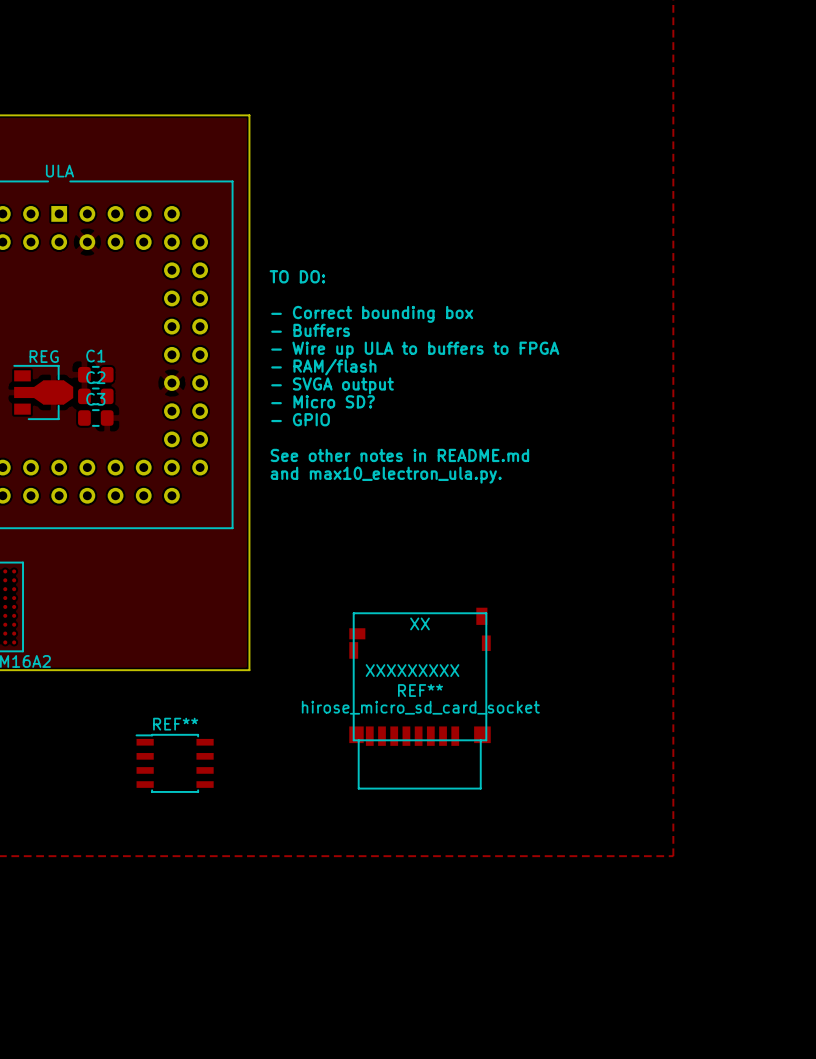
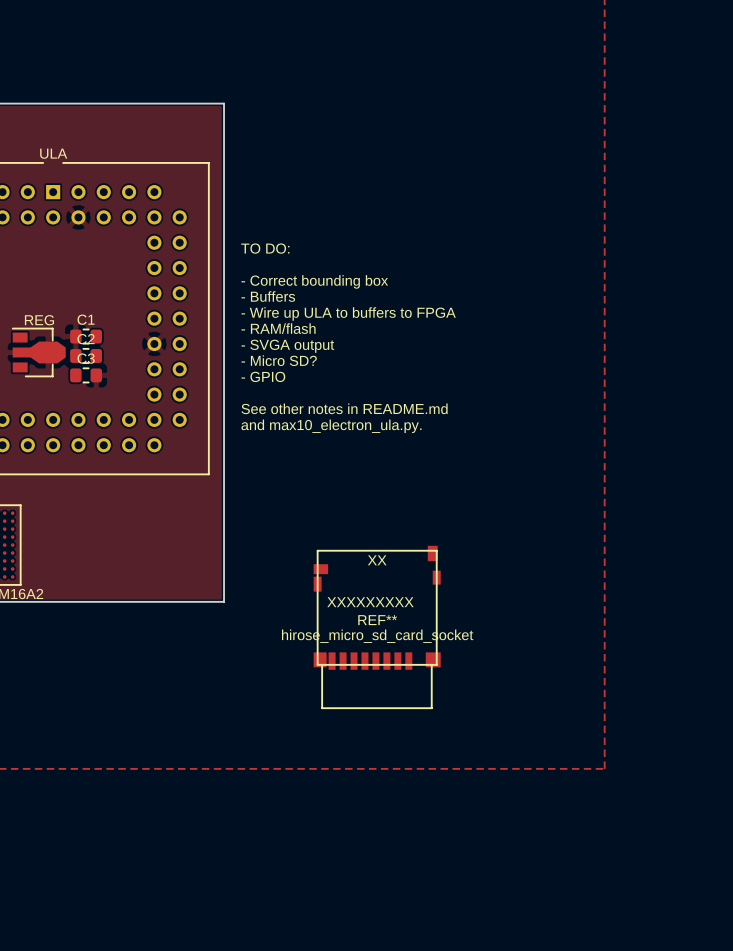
REF**: (174, 763) -> none

